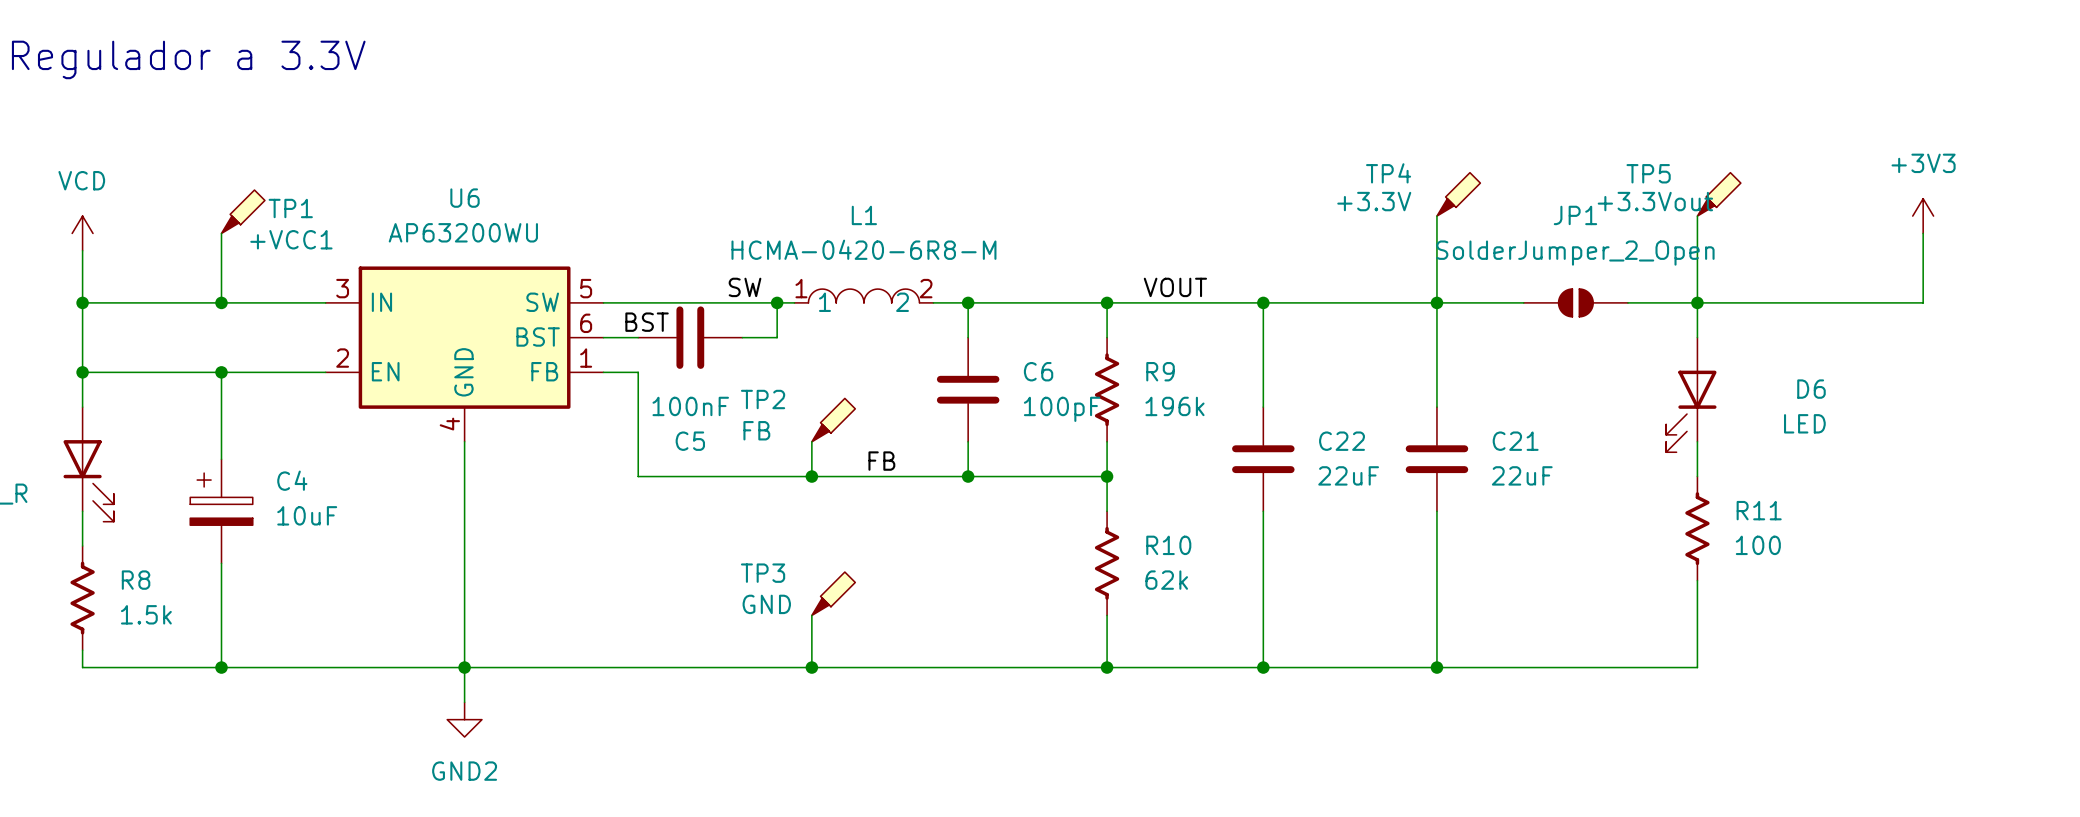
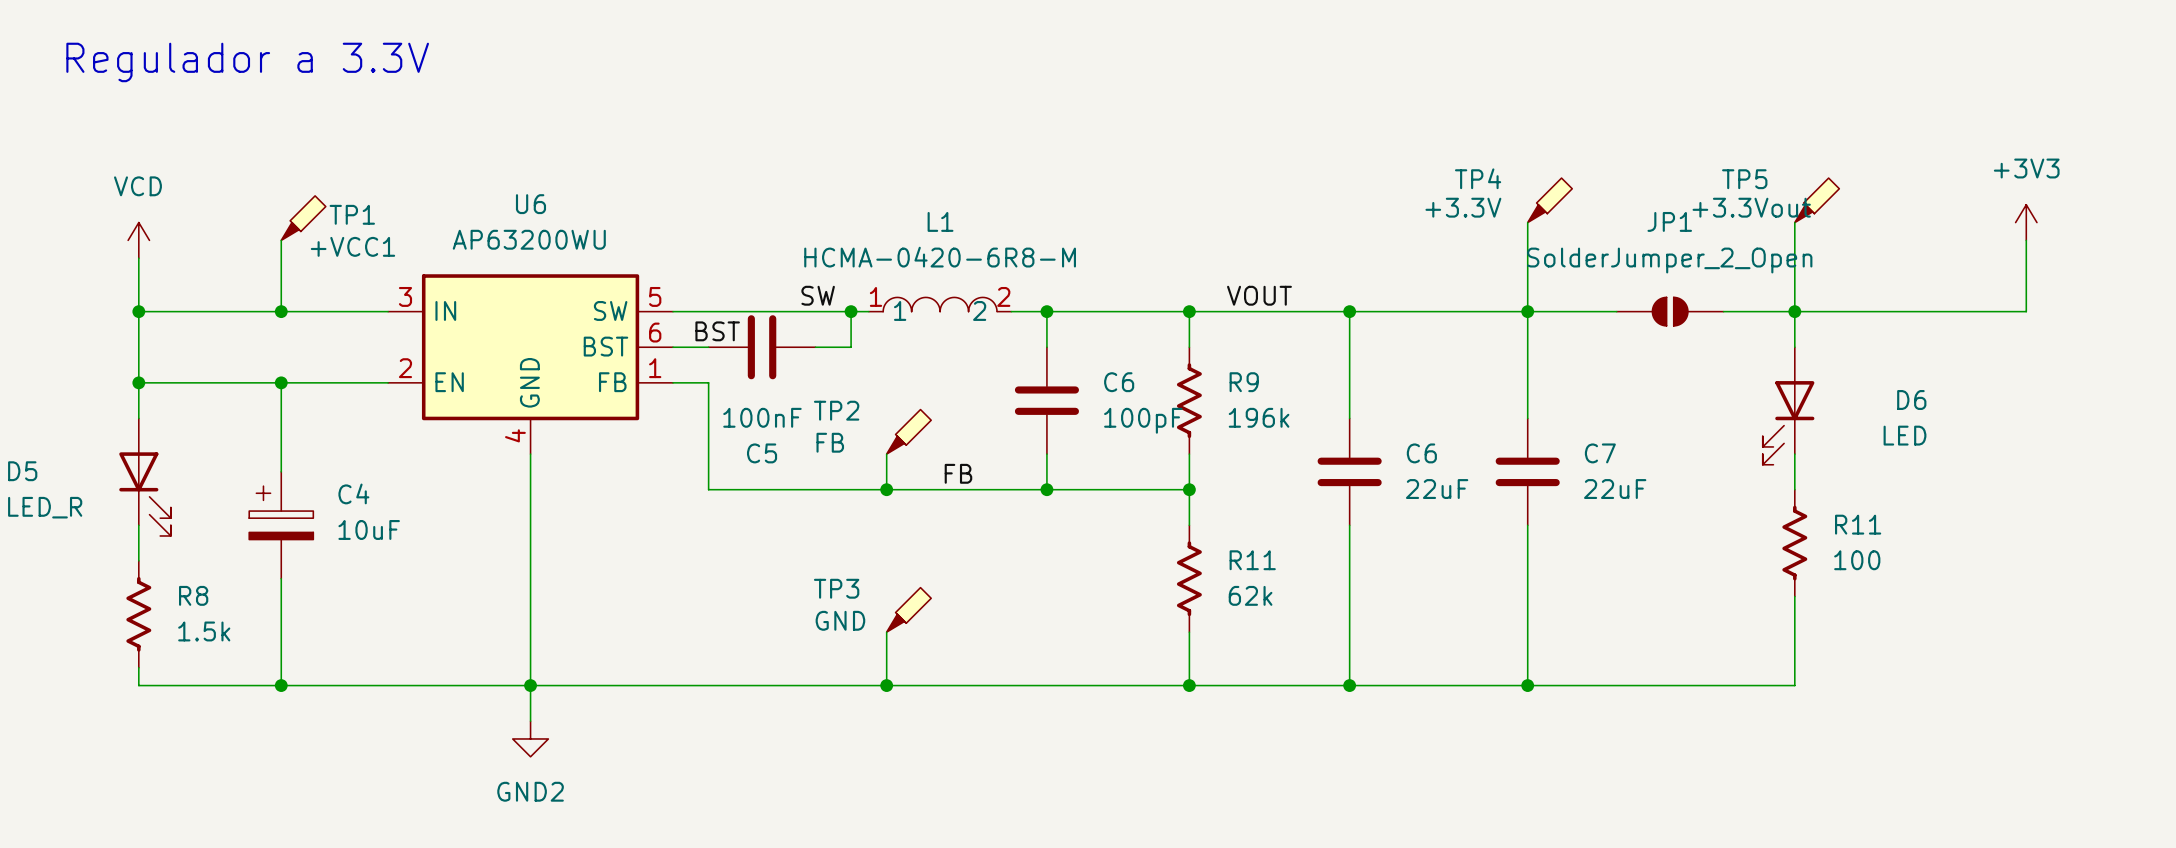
C22 name: C22 (1342, 441) -> C6 (1421, 453)
C21 name: C21 (1515, 441) -> C7 (1600, 453)
R10 name: R10 (1168, 545) -> R11 (1252, 560)

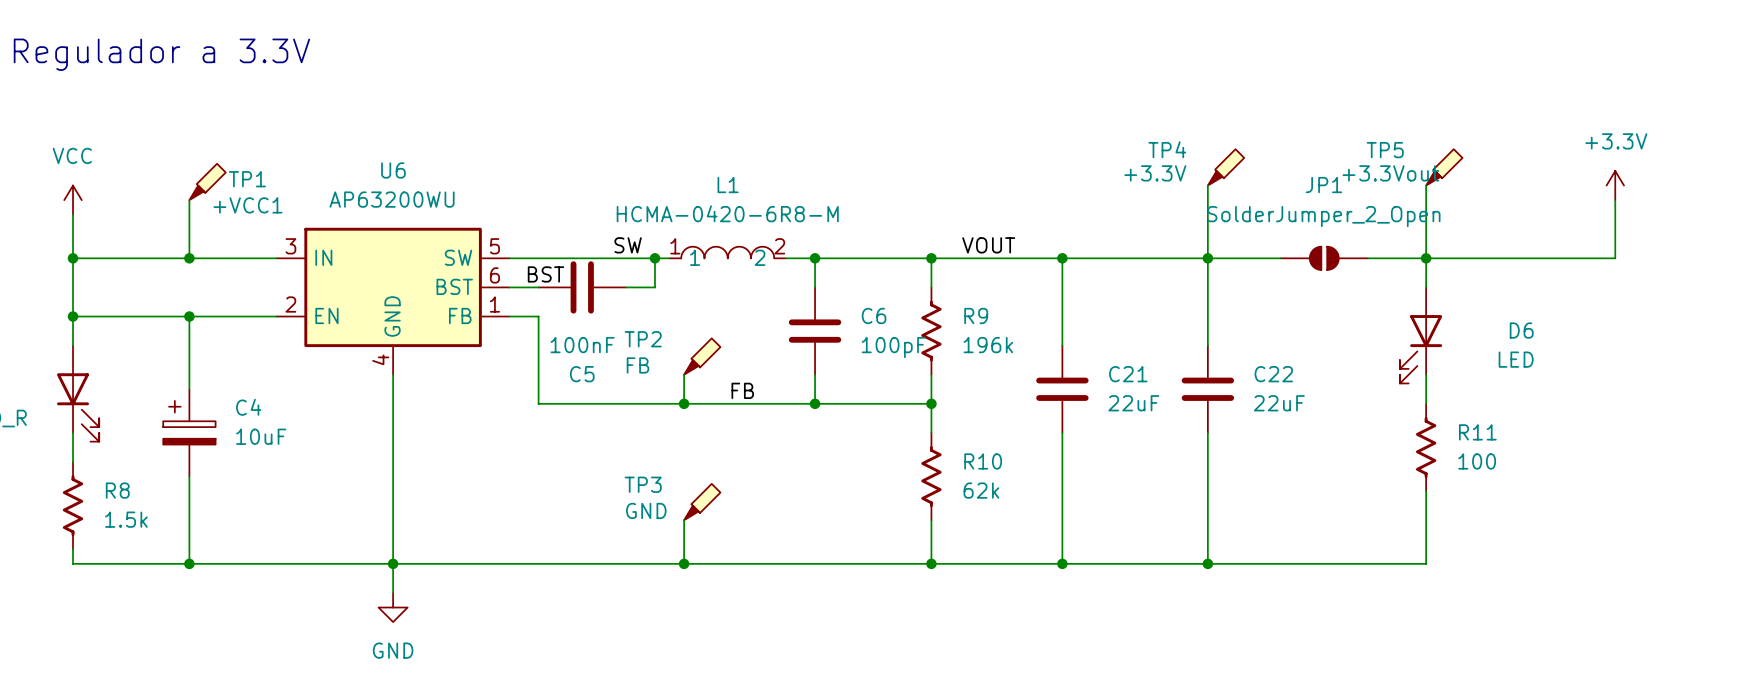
power symbol: +3V3 (2026, 222) -> +3.3V (1615, 185)
power symbol: VCD (138, 240) -> VCC (73, 200)
C6 name: C6 (1421, 453) -> C21 (1128, 374)
C7 name: C7 (1600, 453) -> C22 (1273, 374)
R11 name: R11 (1252, 560) -> R10 (983, 461)
power symbol: GND2 (530, 738) -> GND (393, 607)

